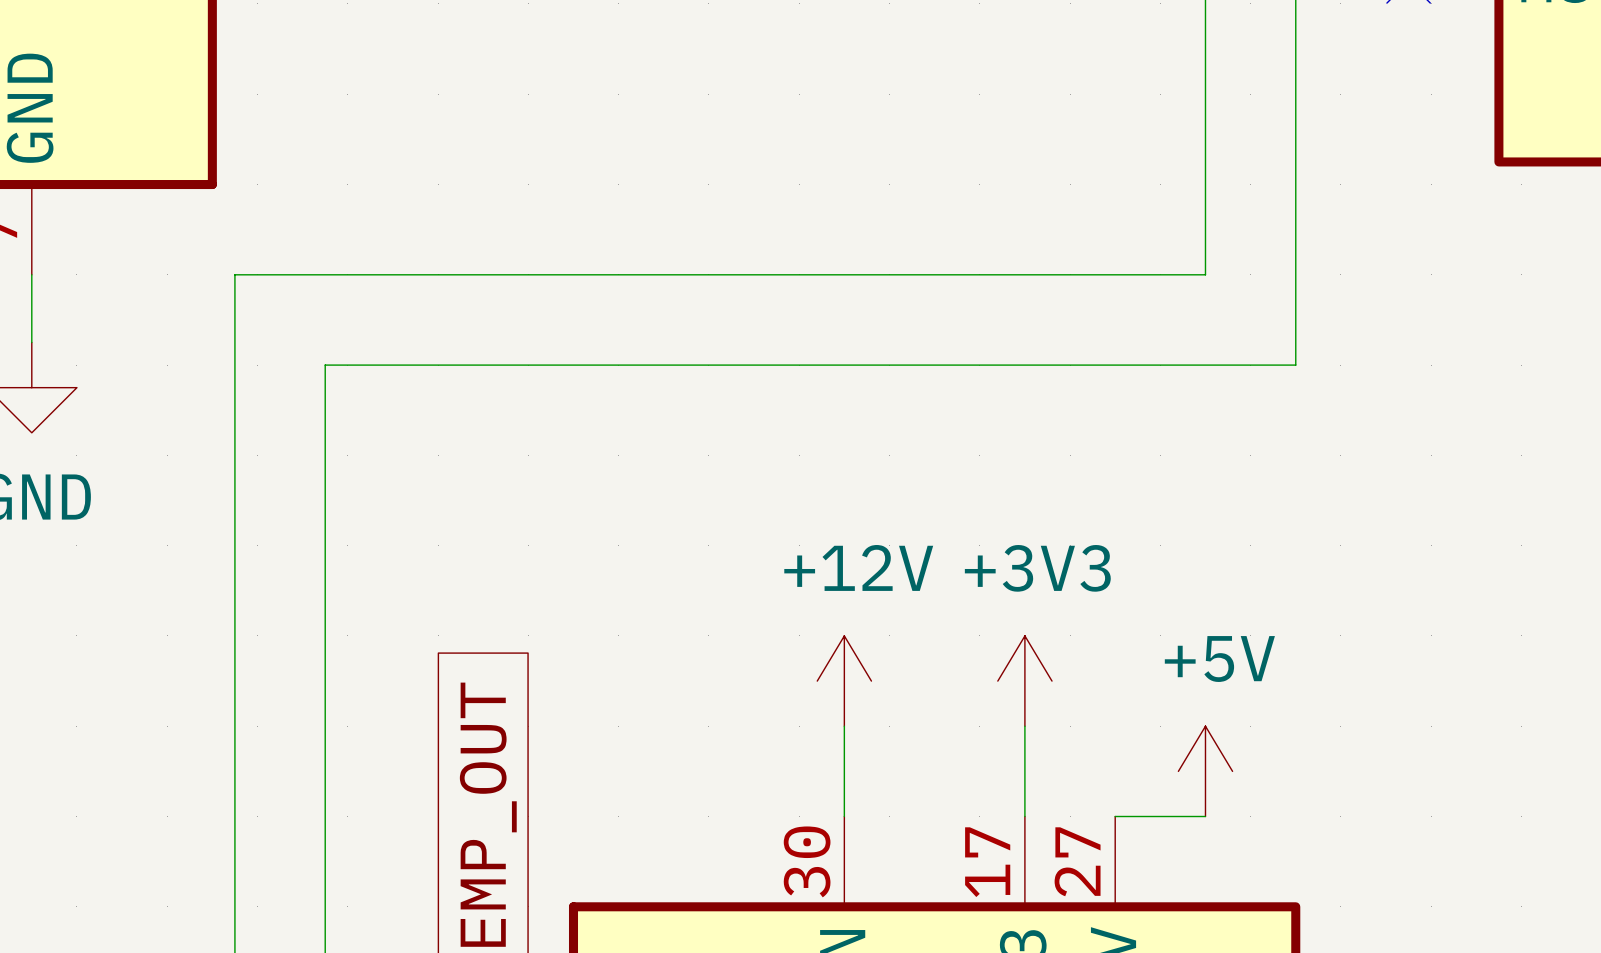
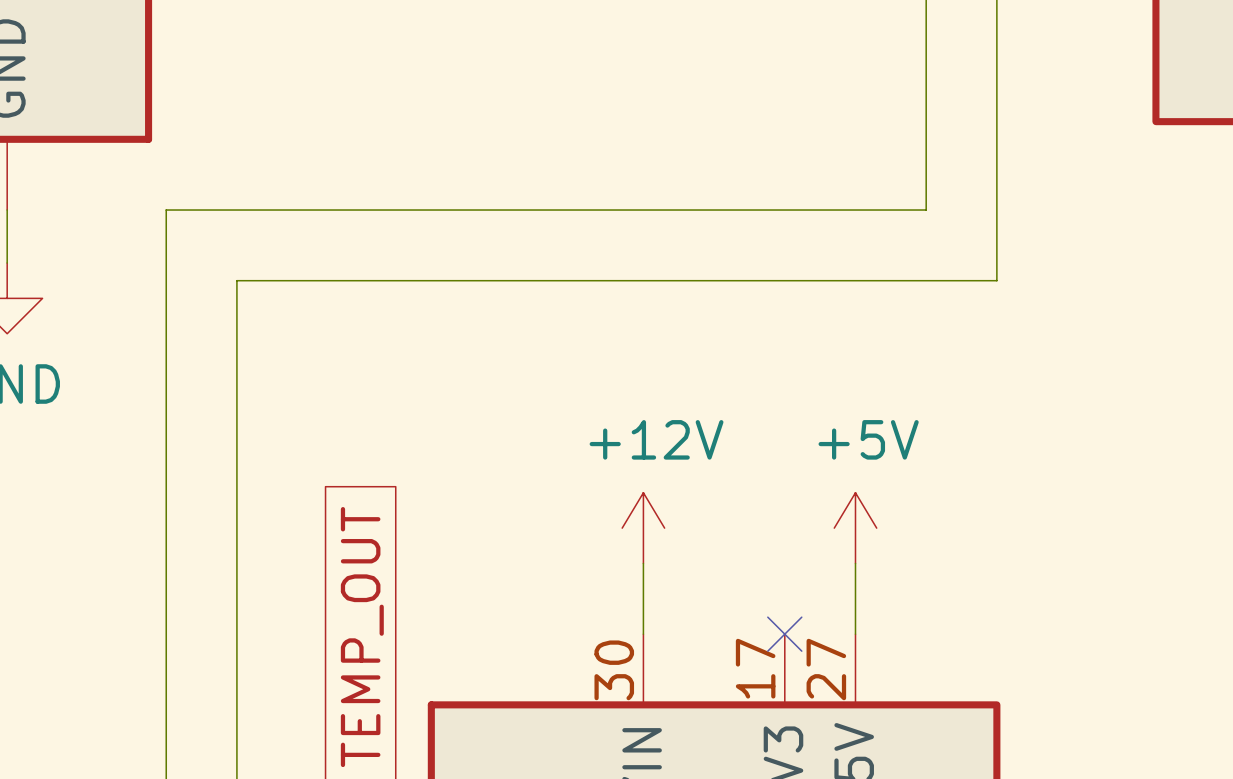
power symbol: +3V3 (1024, 681) -> none
wire: (1024, 726) (1024, 816) -> none
power symbol position: +5V (1205, 771) -> +5V (855, 528)
no-connect mark: none -> (784, 634)
wire: (1115, 816) (1205, 816) -> (855, 634) (855, 563)

